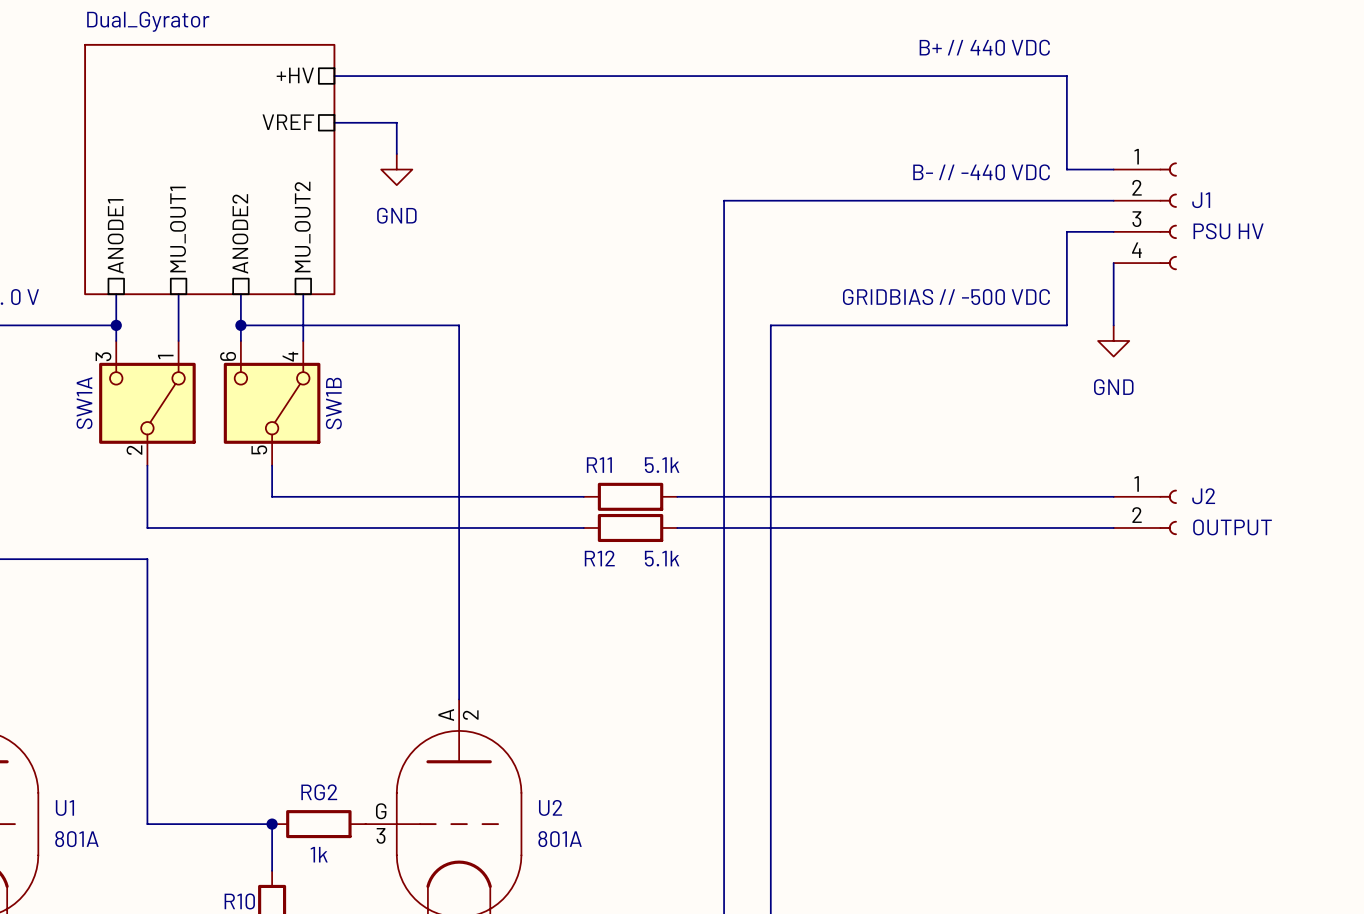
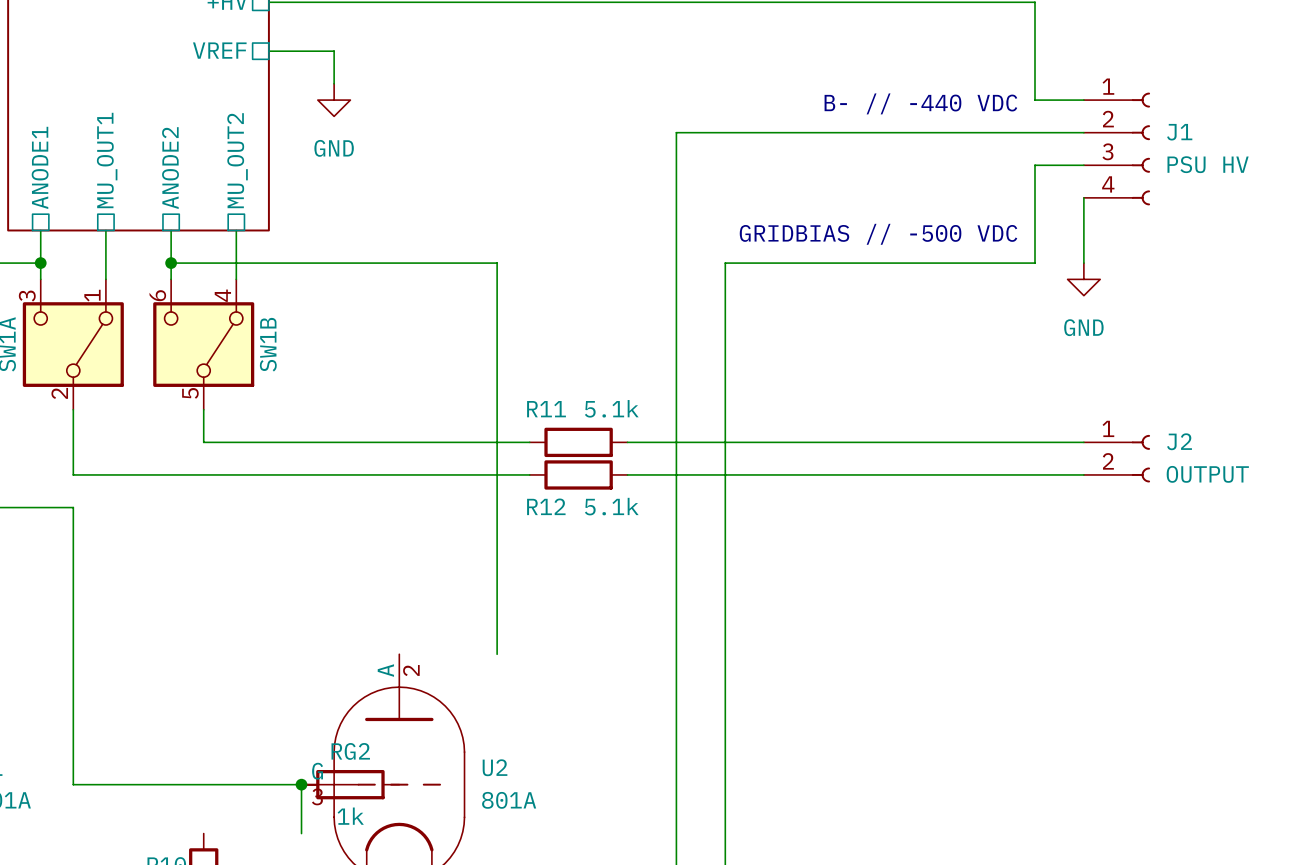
wire: (459, 325) (459, 699) -> (399, 263) (497, 263) (497, 654)
wire: (272, 824) (272, 870) -> (203, 784) (301, 784) (301, 833)
junction: (272, 824) -> none
RG2 position: (318, 824) -> (350, 784)
junction: none -> (301, 784)

